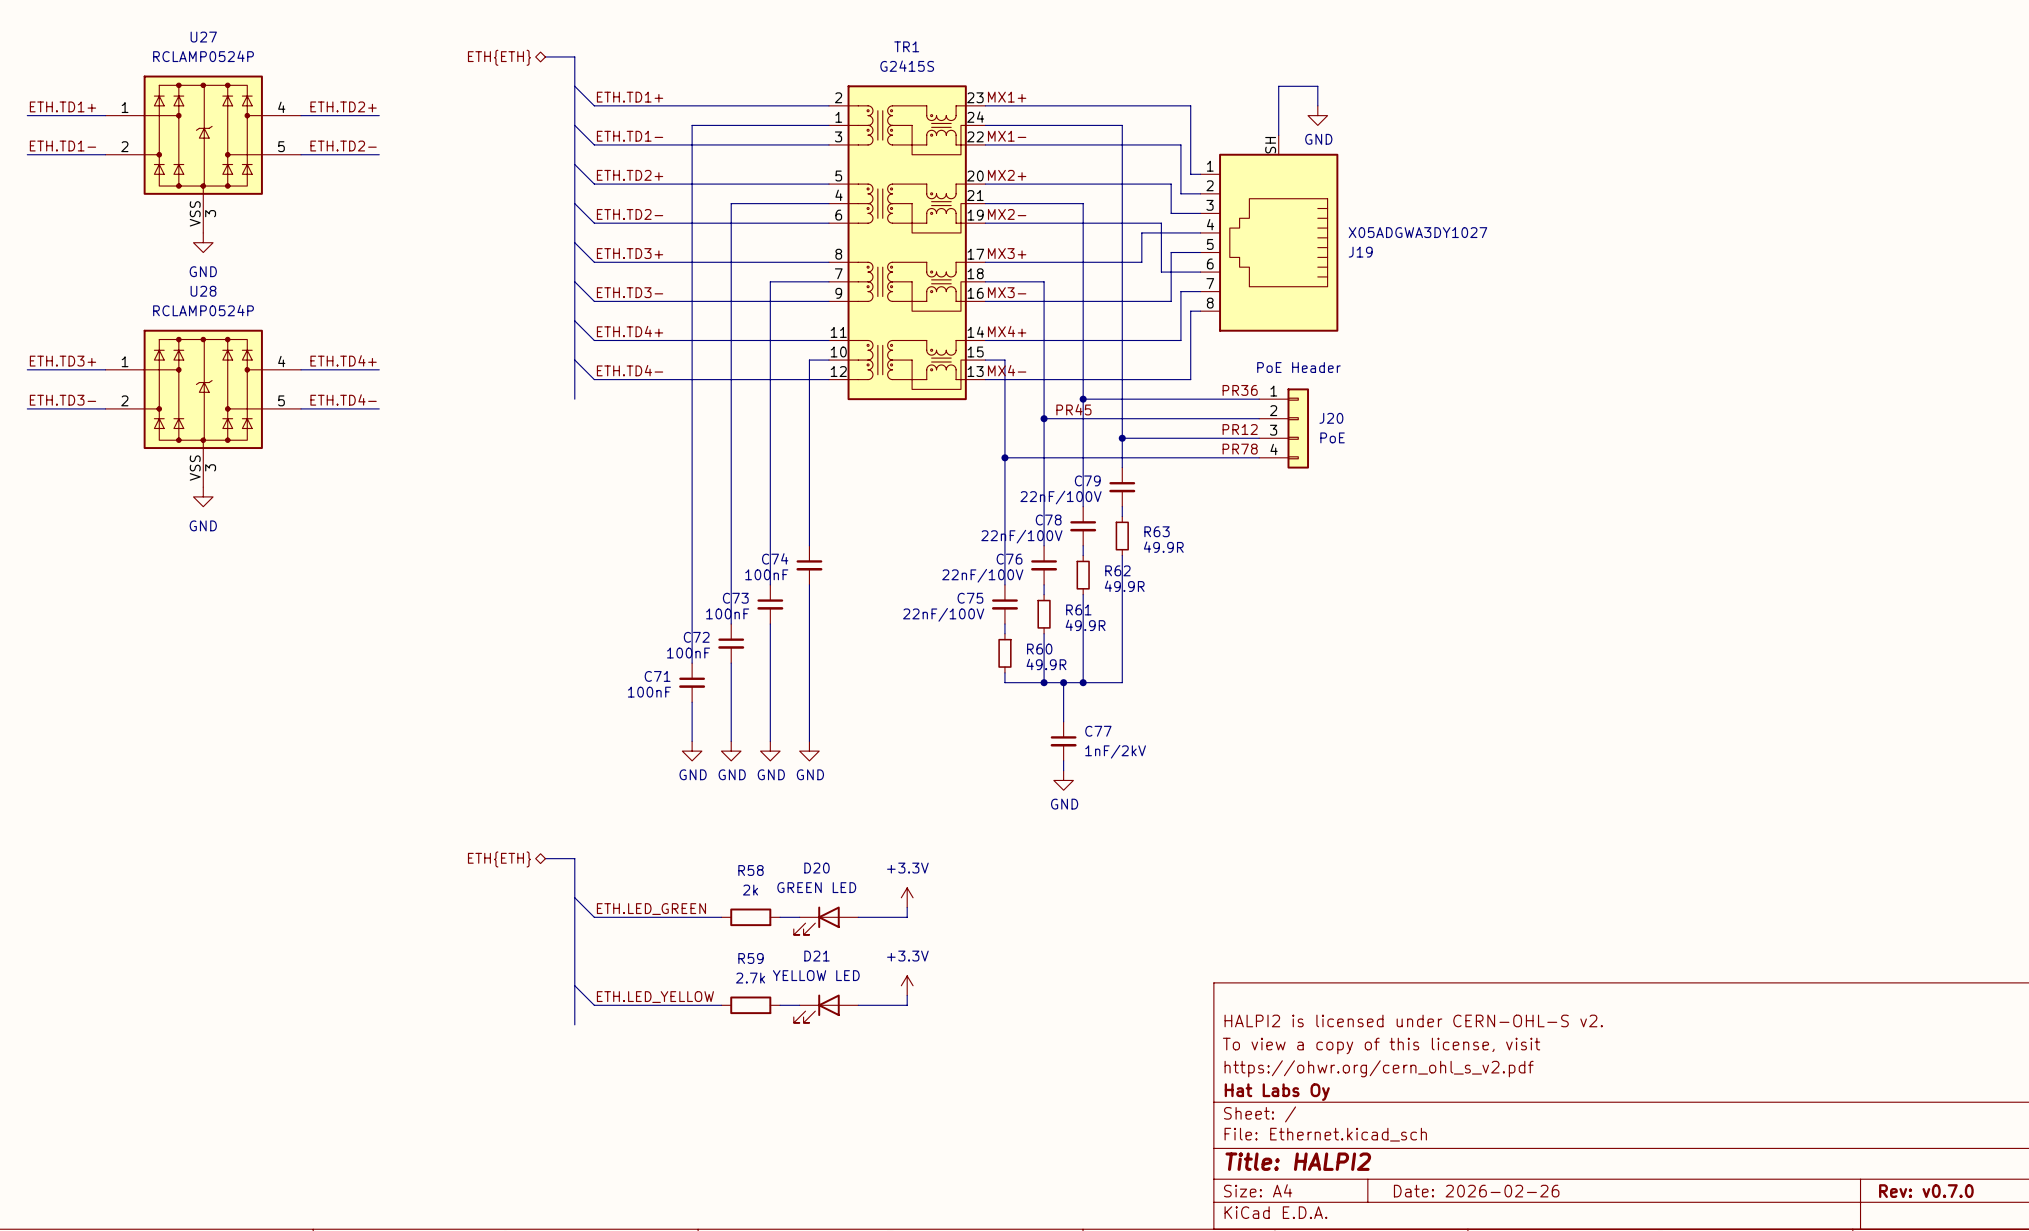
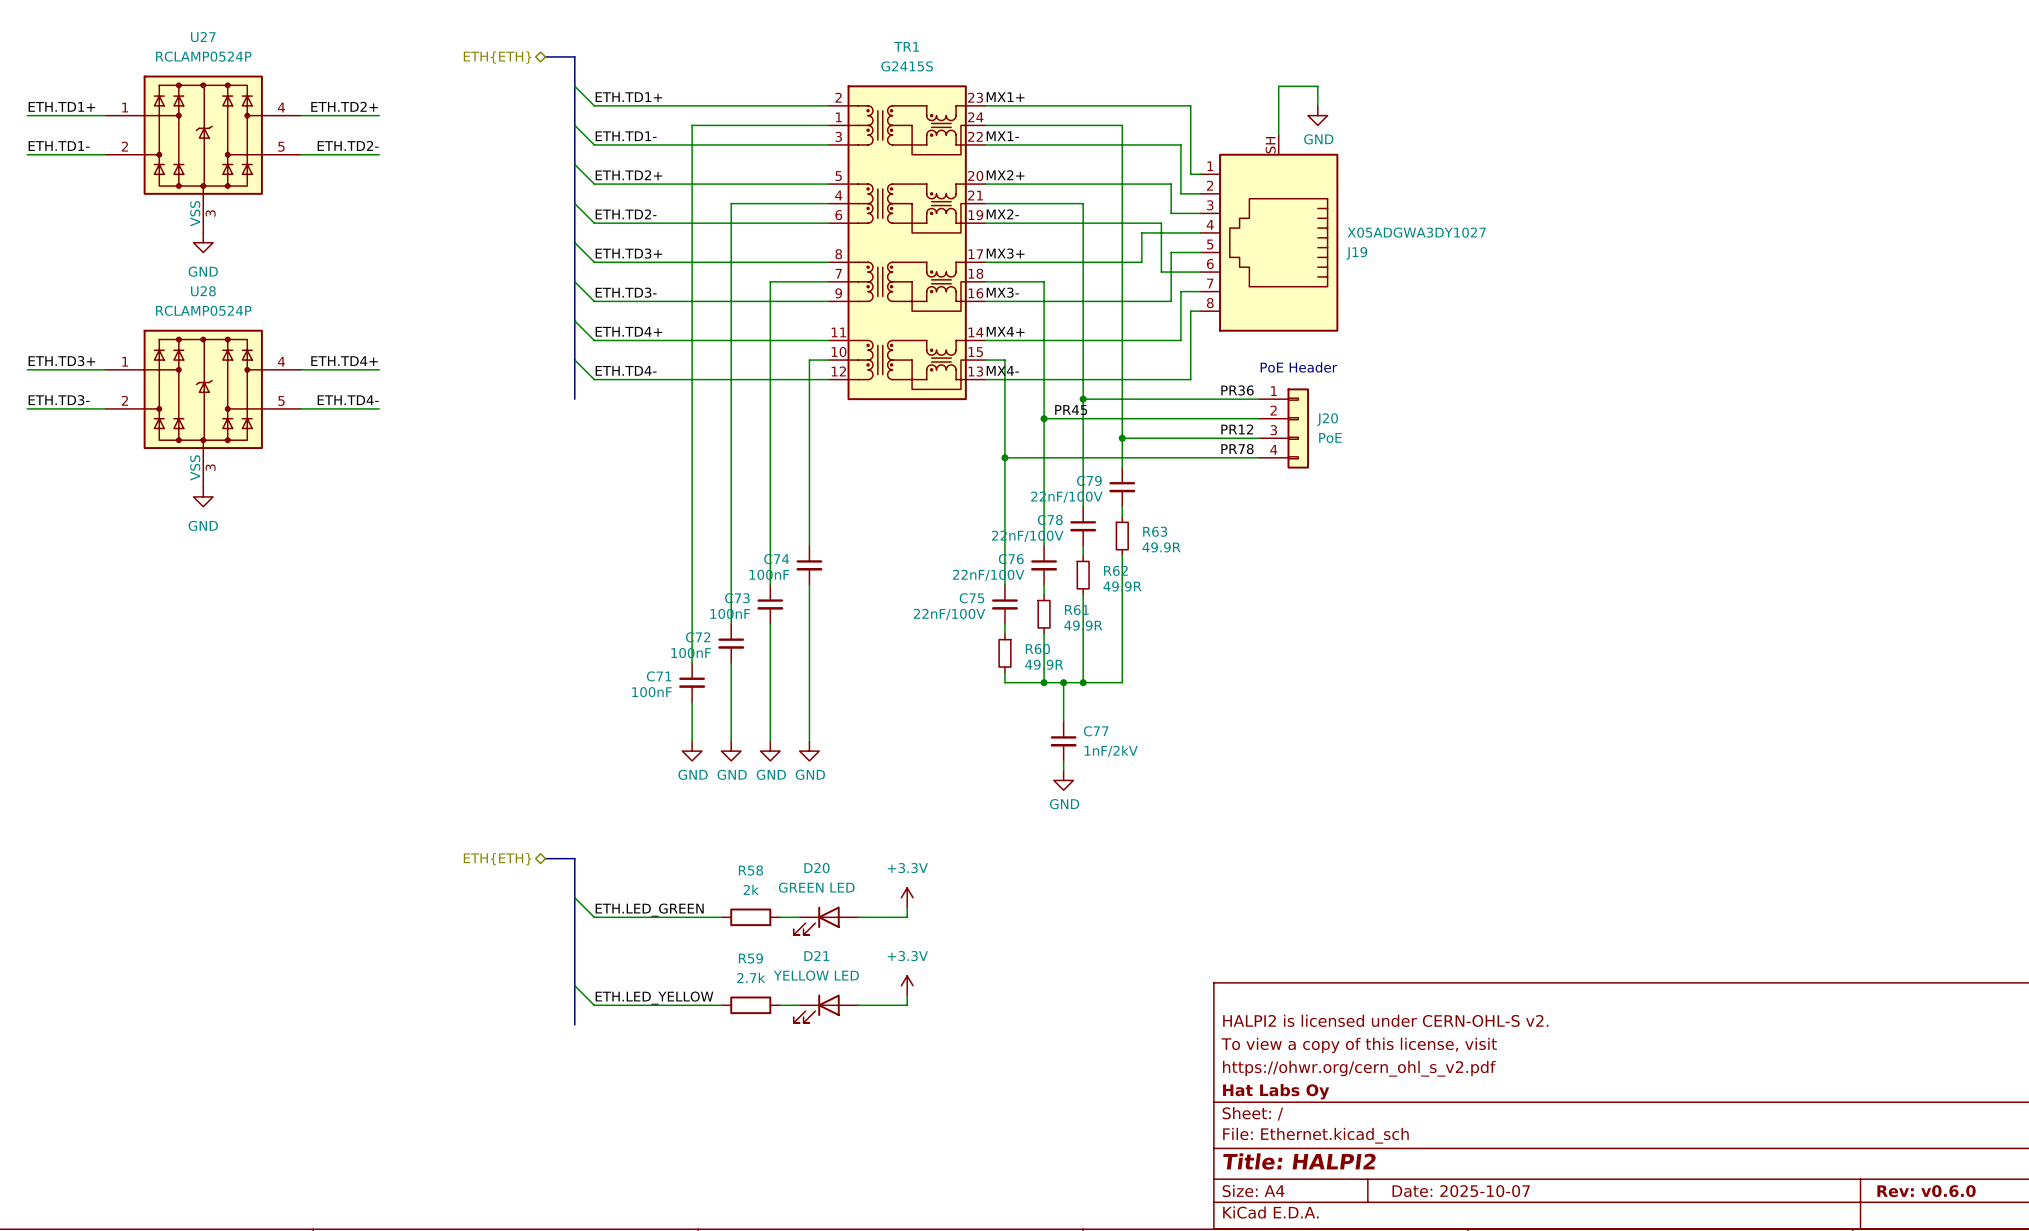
title block: Date: 2026-02-26 (1476, 1191) -> Date: 2025-10-07 (1461, 1191)
title block: Rev: v0.7.0 (1926, 1191) -> Rev: v0.6.0 (1926, 1191)

